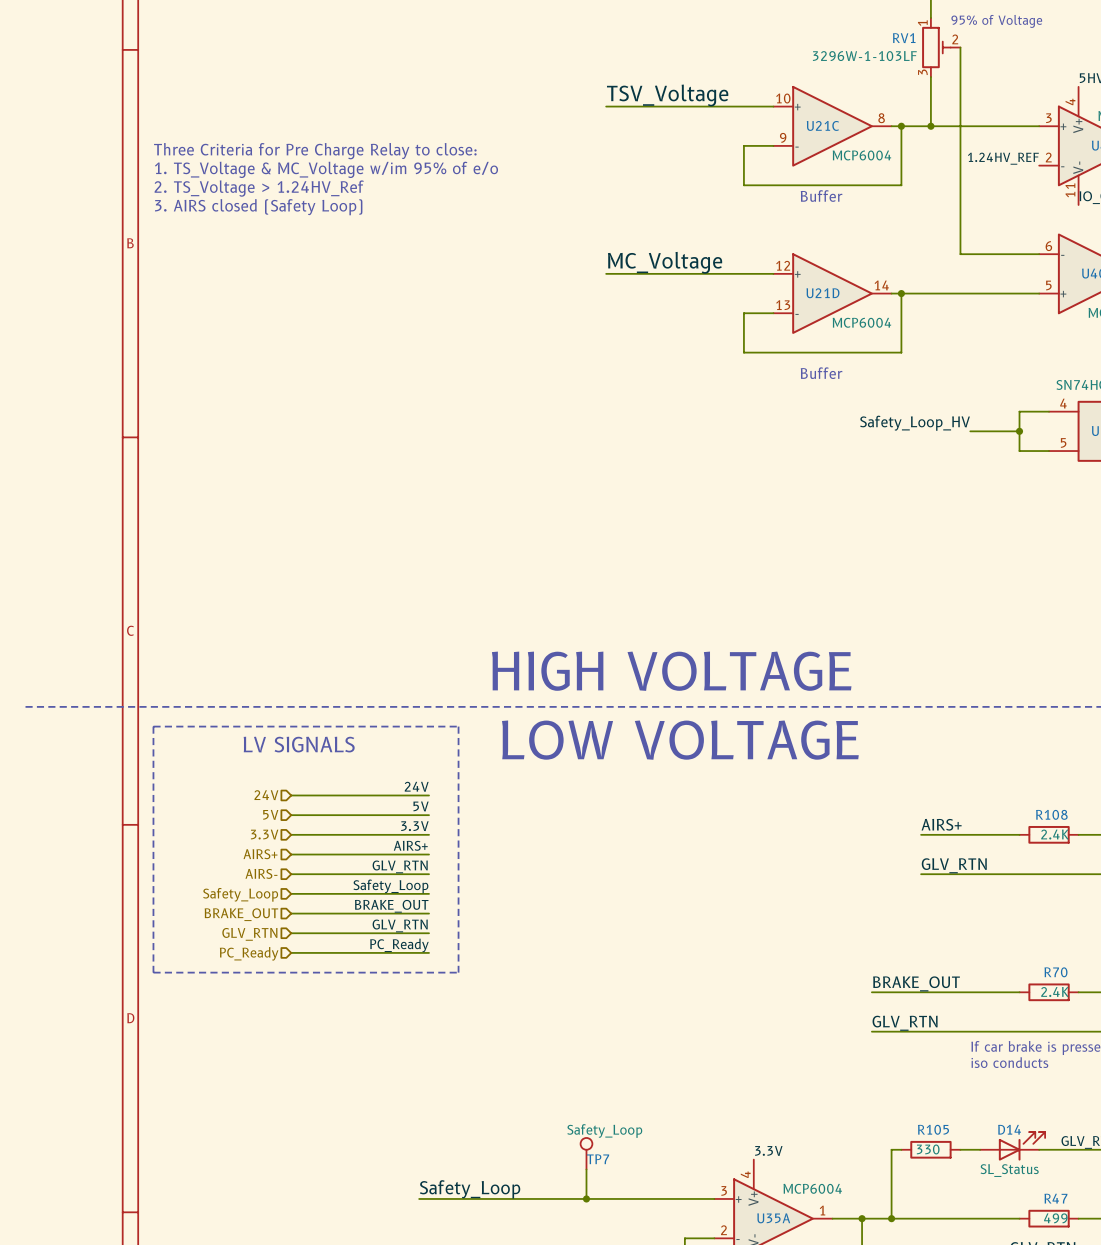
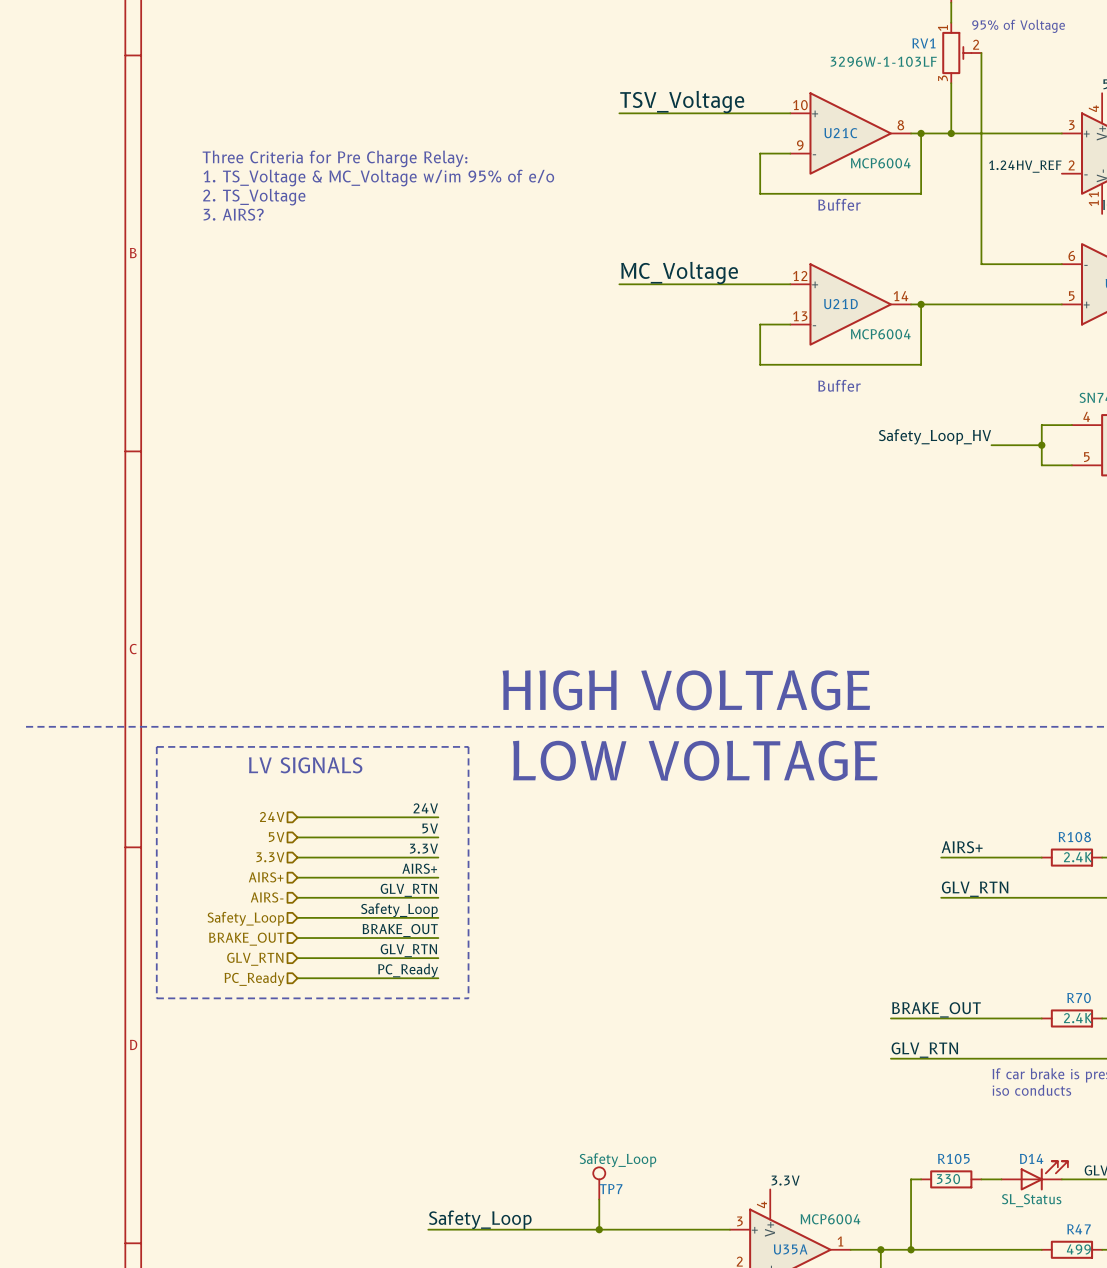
text: Three Criteria for Pre Charge Relay to close: (315, 151) -> Three Criteria for Pre Charge Relay: (335, 158)
text position: 1. TS_Voltage & MC_Voltage w/im 95% of e/o (326, 169) -> 1. TS_Voltage & MC_Voltage w/im 95% of e/o (378, 178)
text: 2. TS_Voltage > 1.24HV_Ref (259, 188) -> 2. TS_Voltage (254, 197)
text: none -> 3. AIRS? (233, 214)
text: 3. AIRS closed (Safety Loop) (258, 207) -> none

